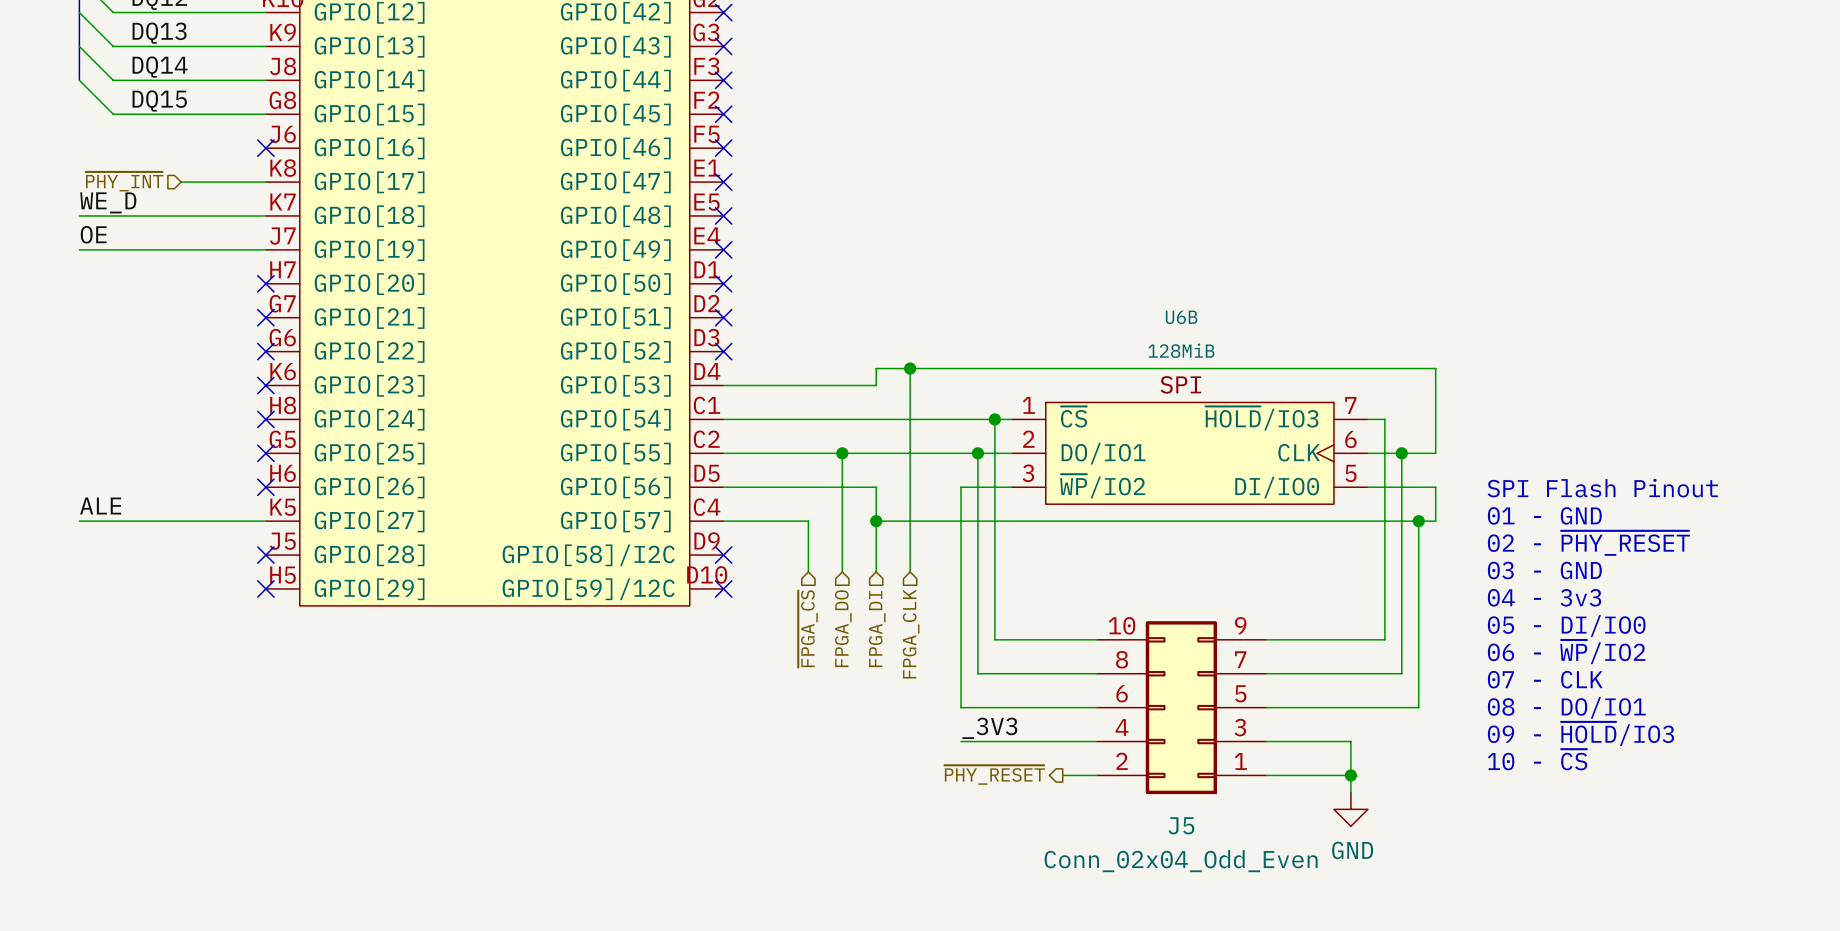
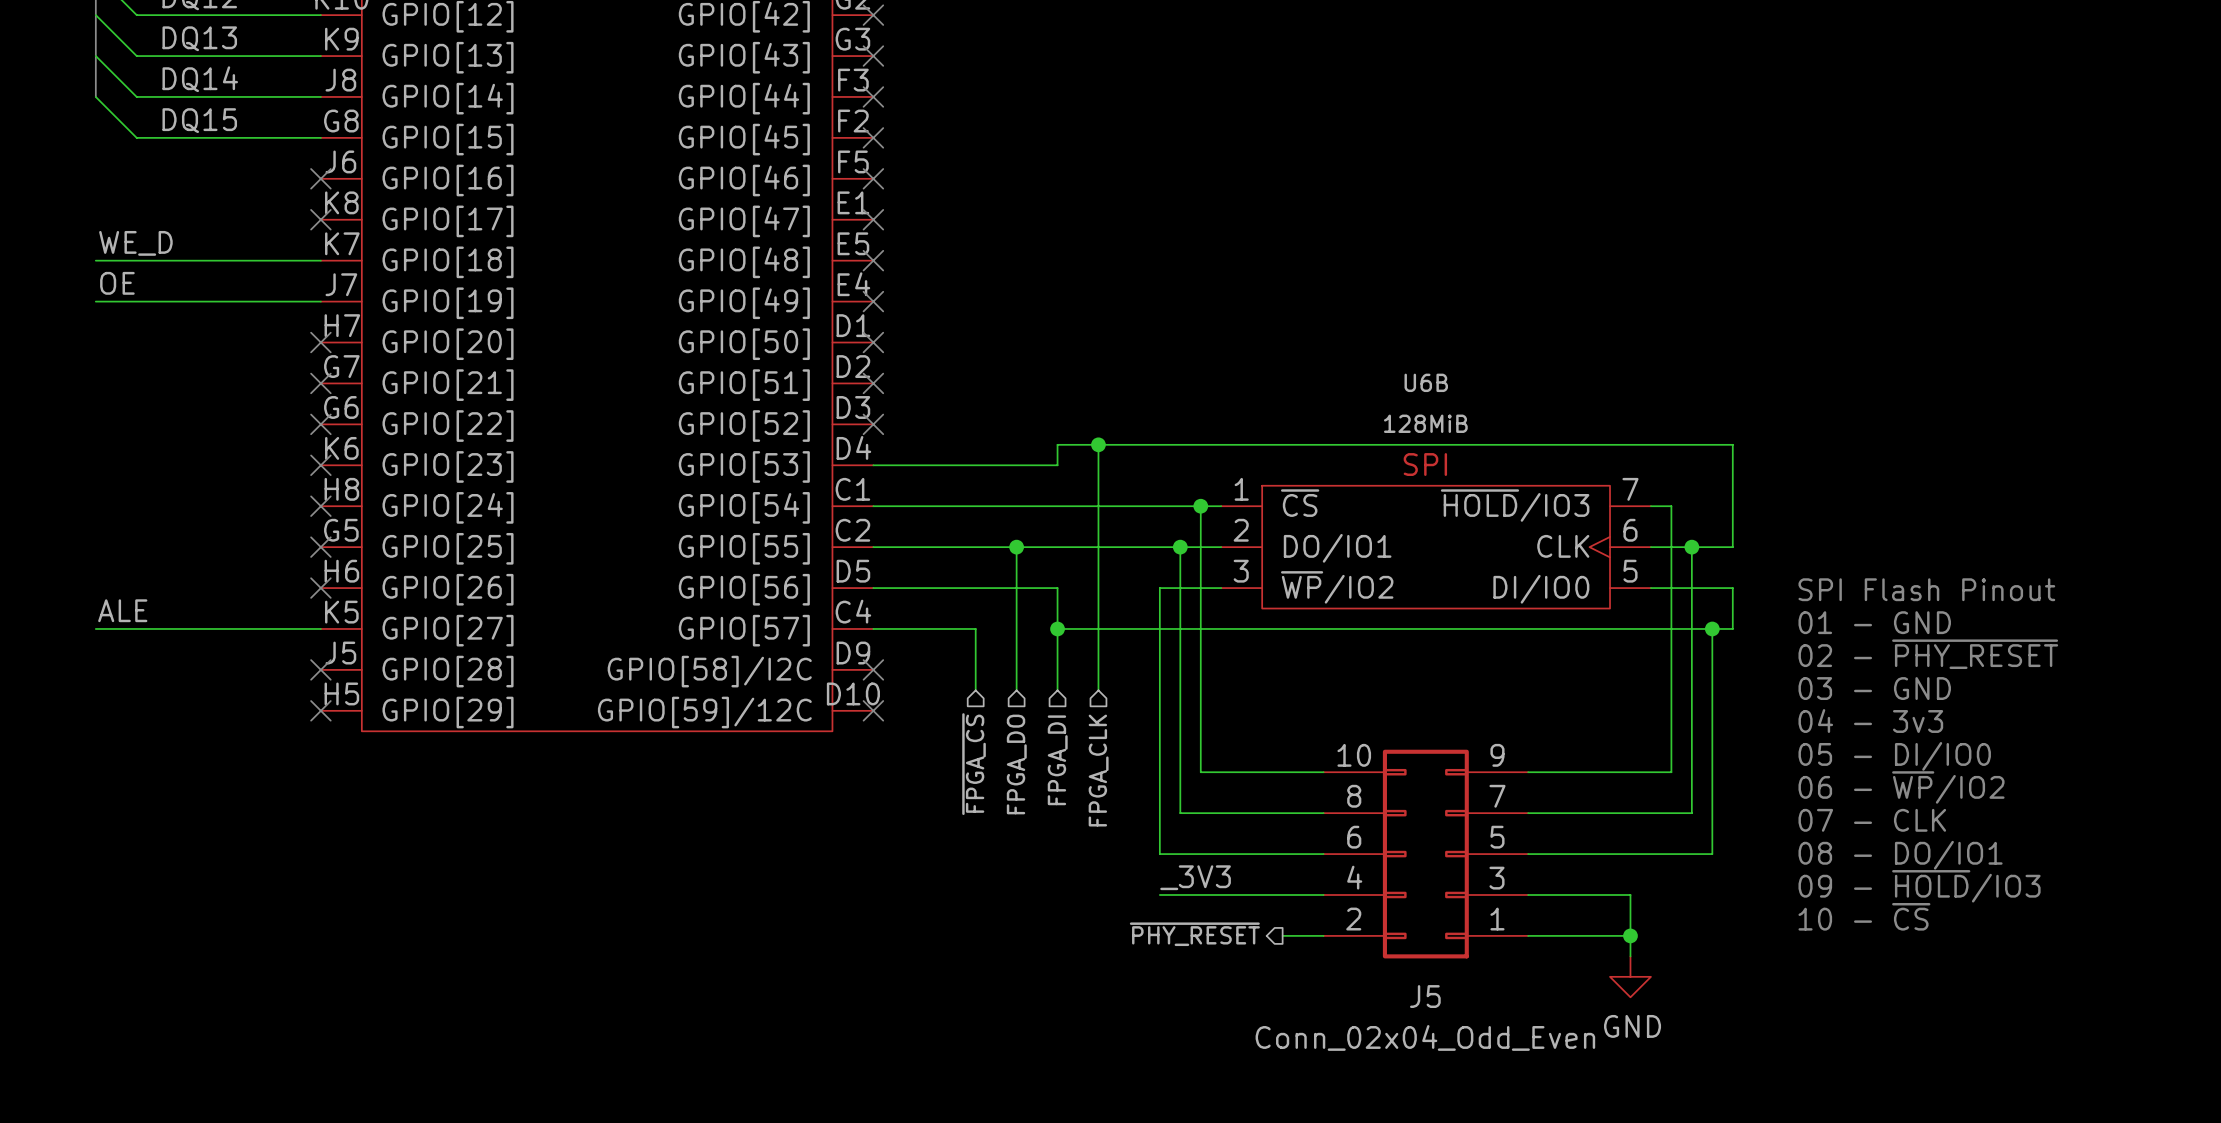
hierarchical label: ~{PHY_INT} (124, 181) -> none
wire: (181, 182) (265, 182) -> none
no-connect mark: none -> (320, 219)

